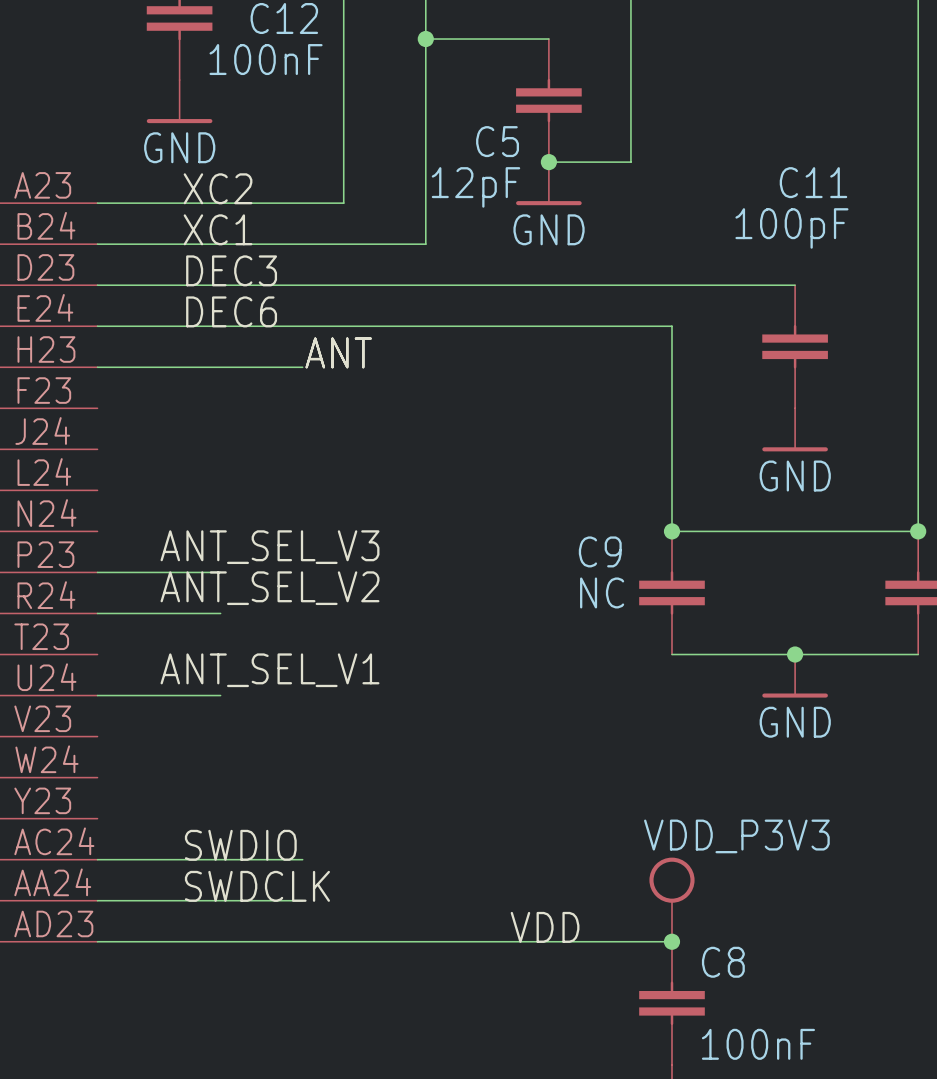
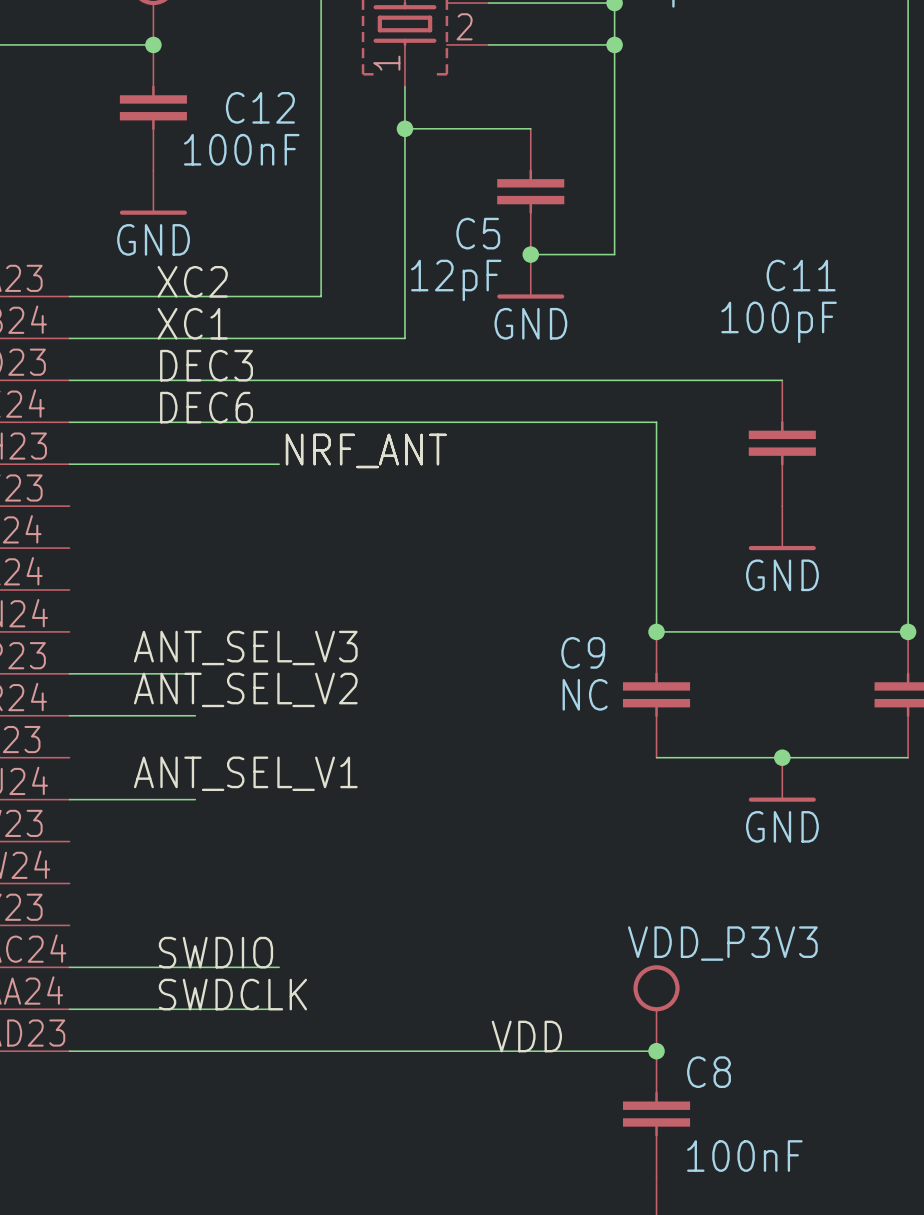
label: ANT (338, 352) -> NRF_ANT (366, 450)

